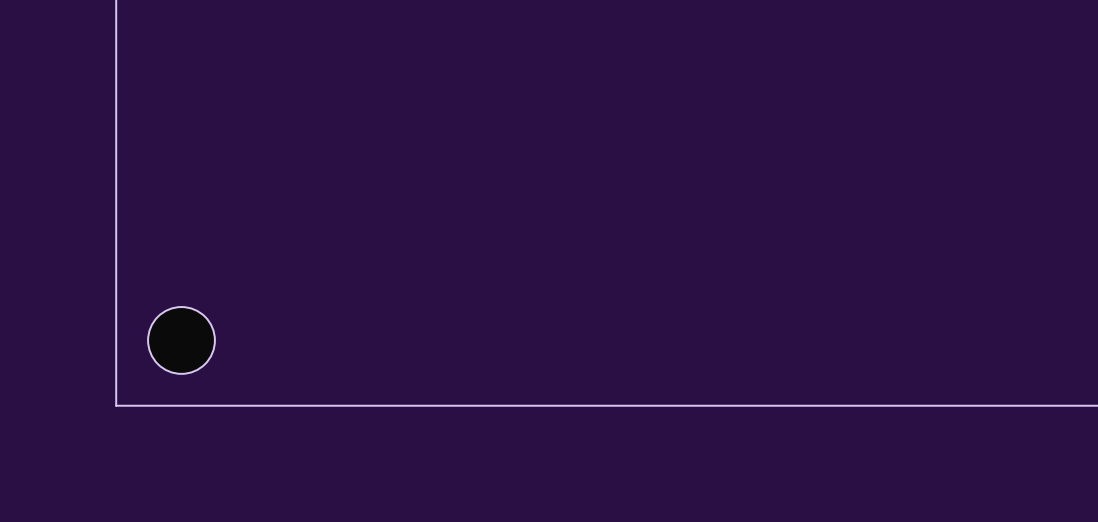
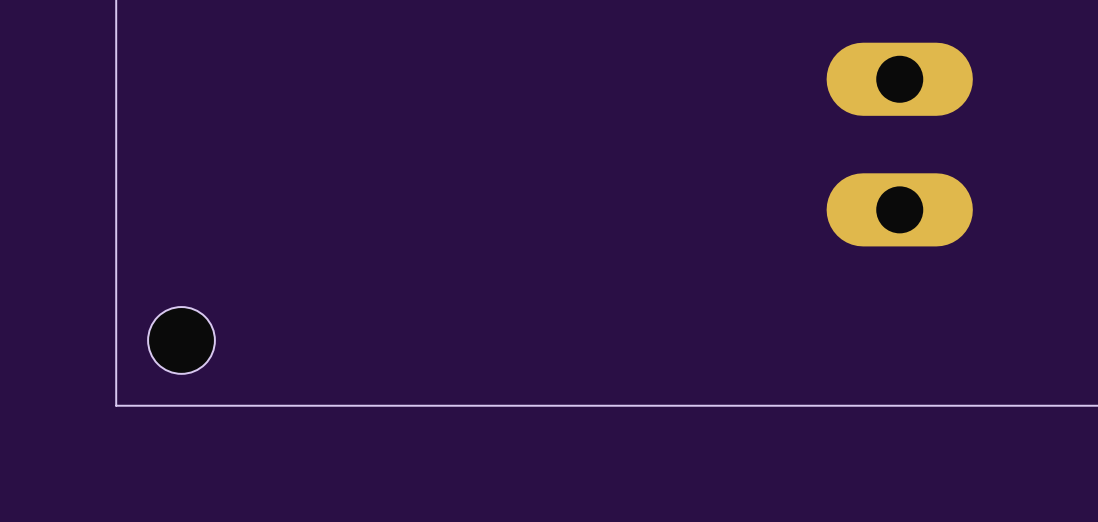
part: none -> (899, 144)

